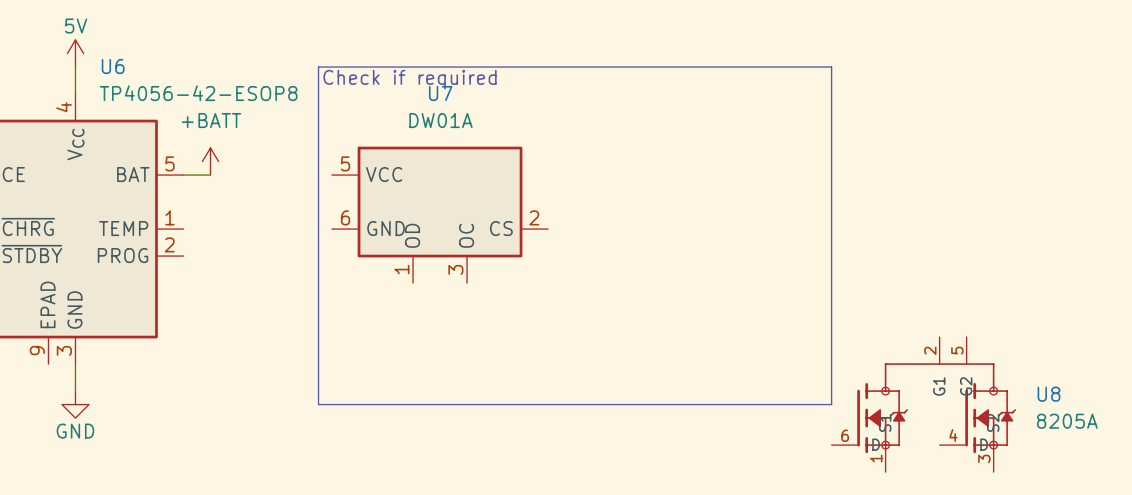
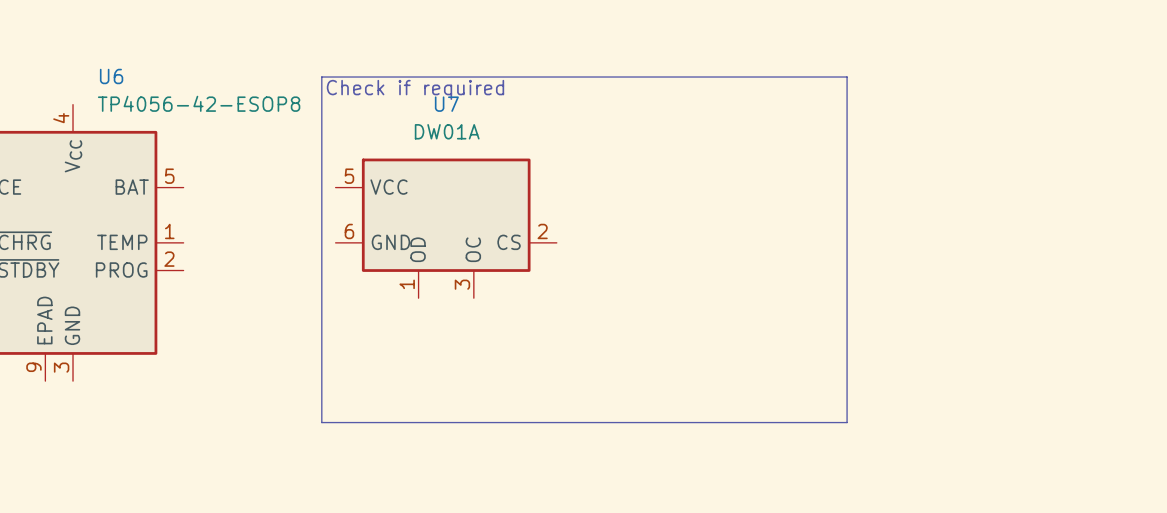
power symbol: 5V (75, 53) -> none
wire: (75, 67) (75, 94) -> none
power symbol: +BATT (210, 161) -> none
wire: (183, 175) (210, 175) -> none
wire: (75, 364) (75, 391) -> none
power symbol: GND (75, 404) -> none
U8: 8205A (923, 404) -> none

